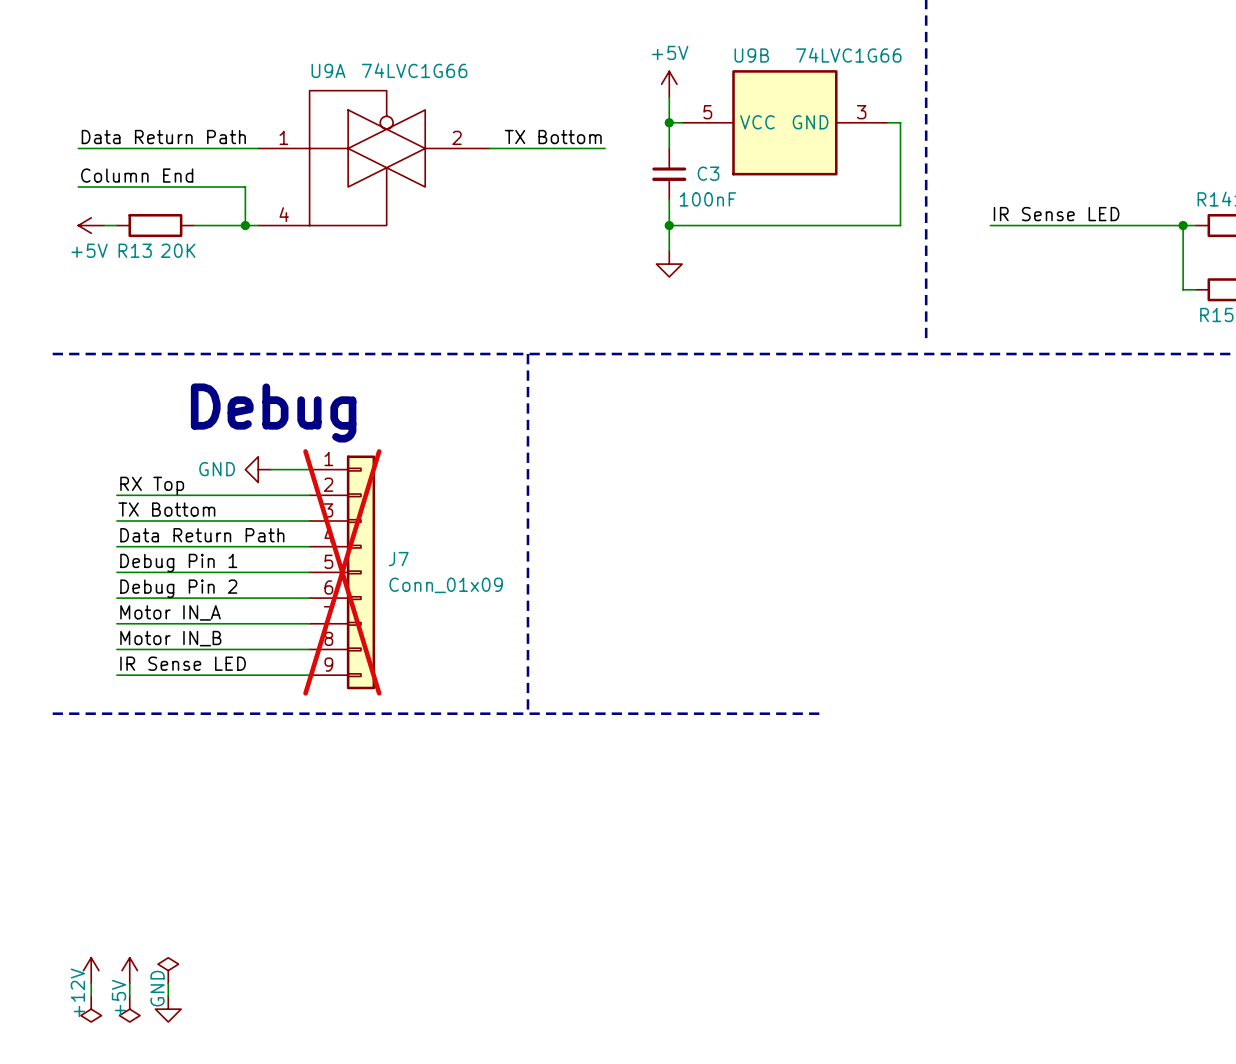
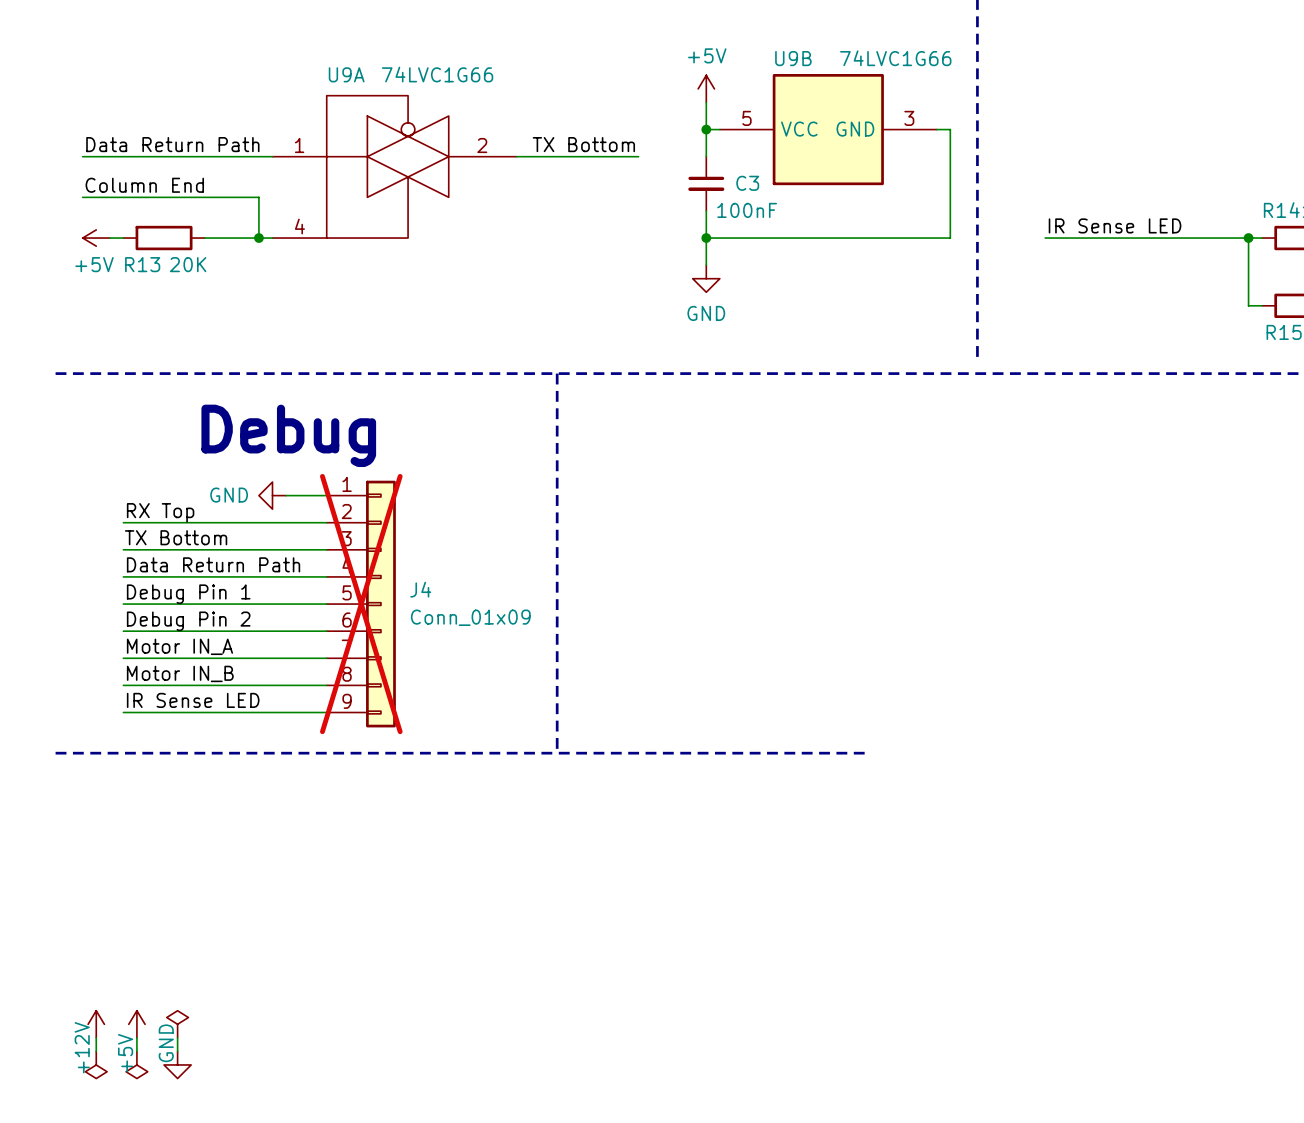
power symbol text: none -> GND (706, 313)
J7 name: J7 (398, 559) -> J4 (420, 589)

